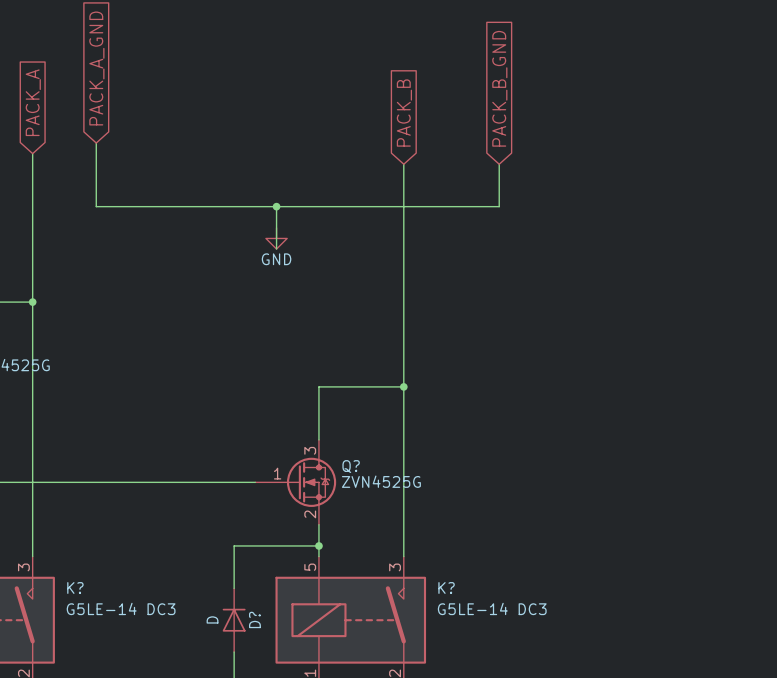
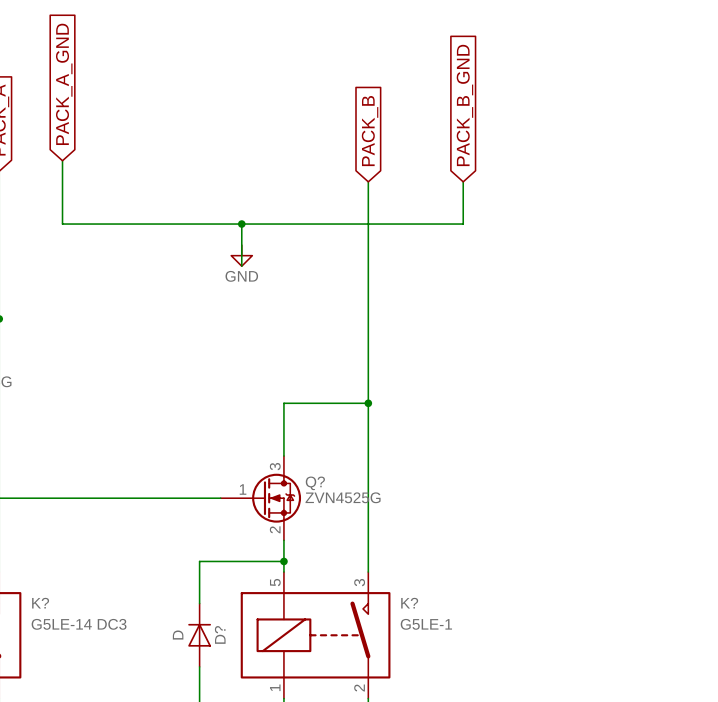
K? value: G5LE-14 DC3 (492, 608) -> G5LE-1 (426, 624)

